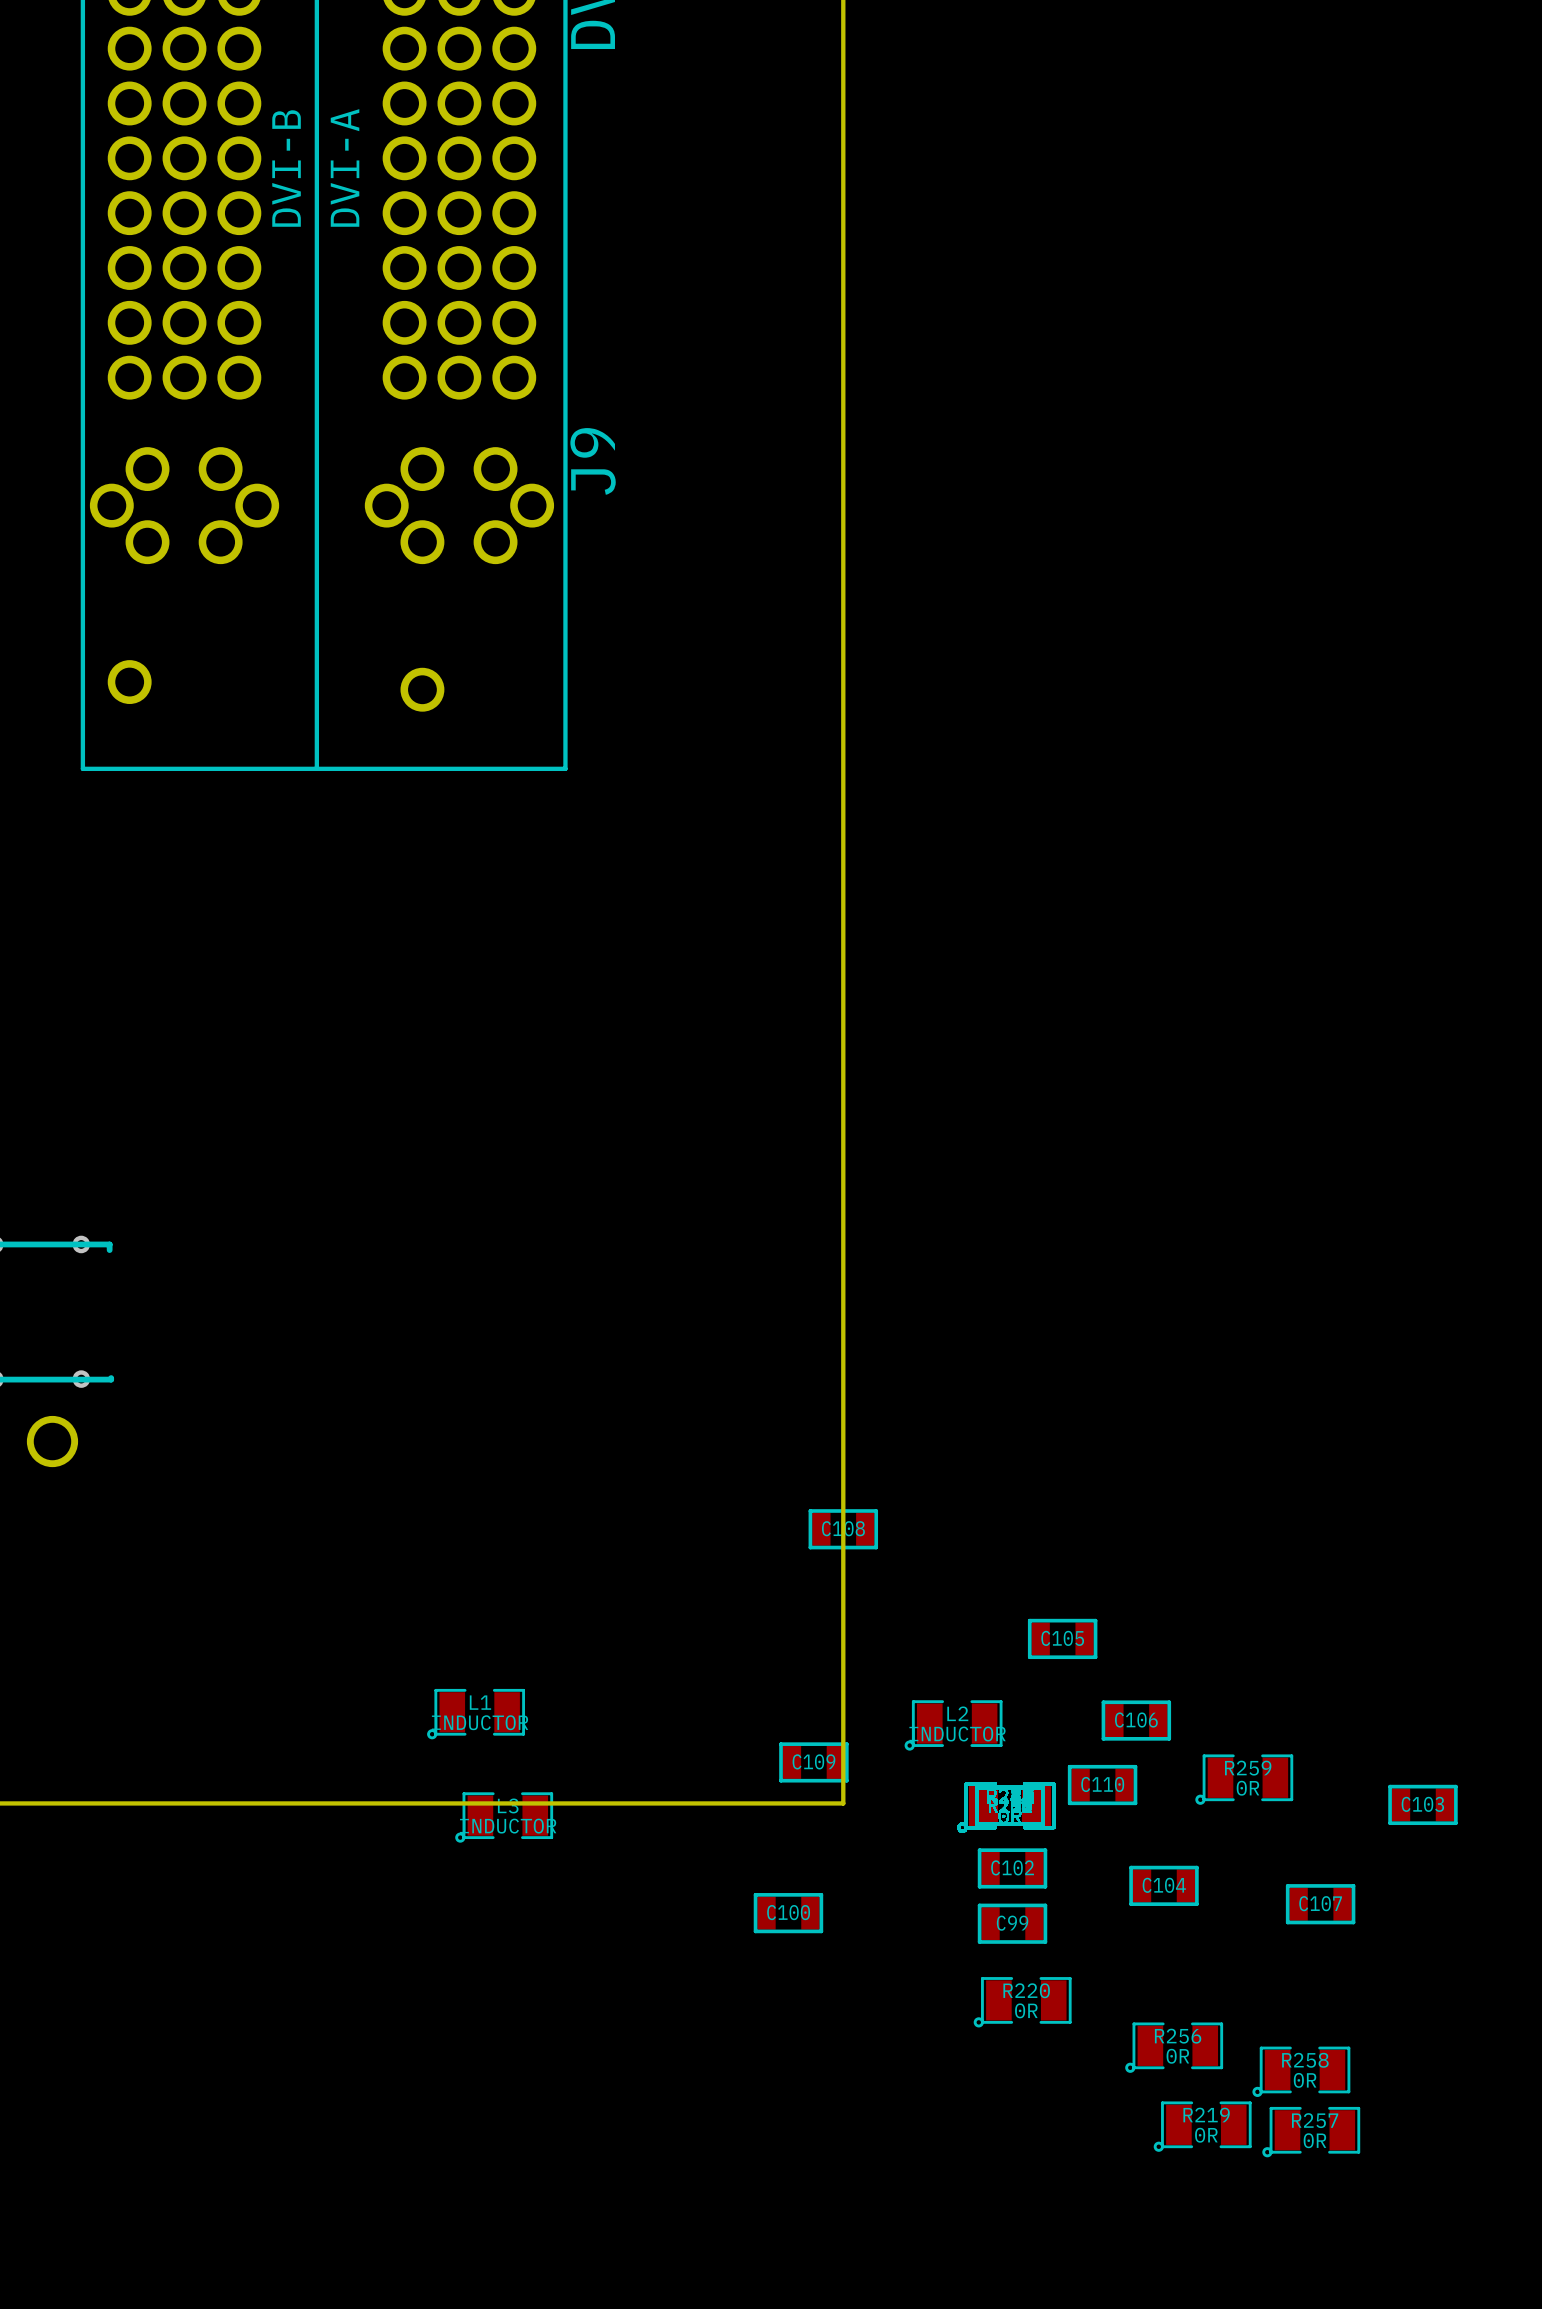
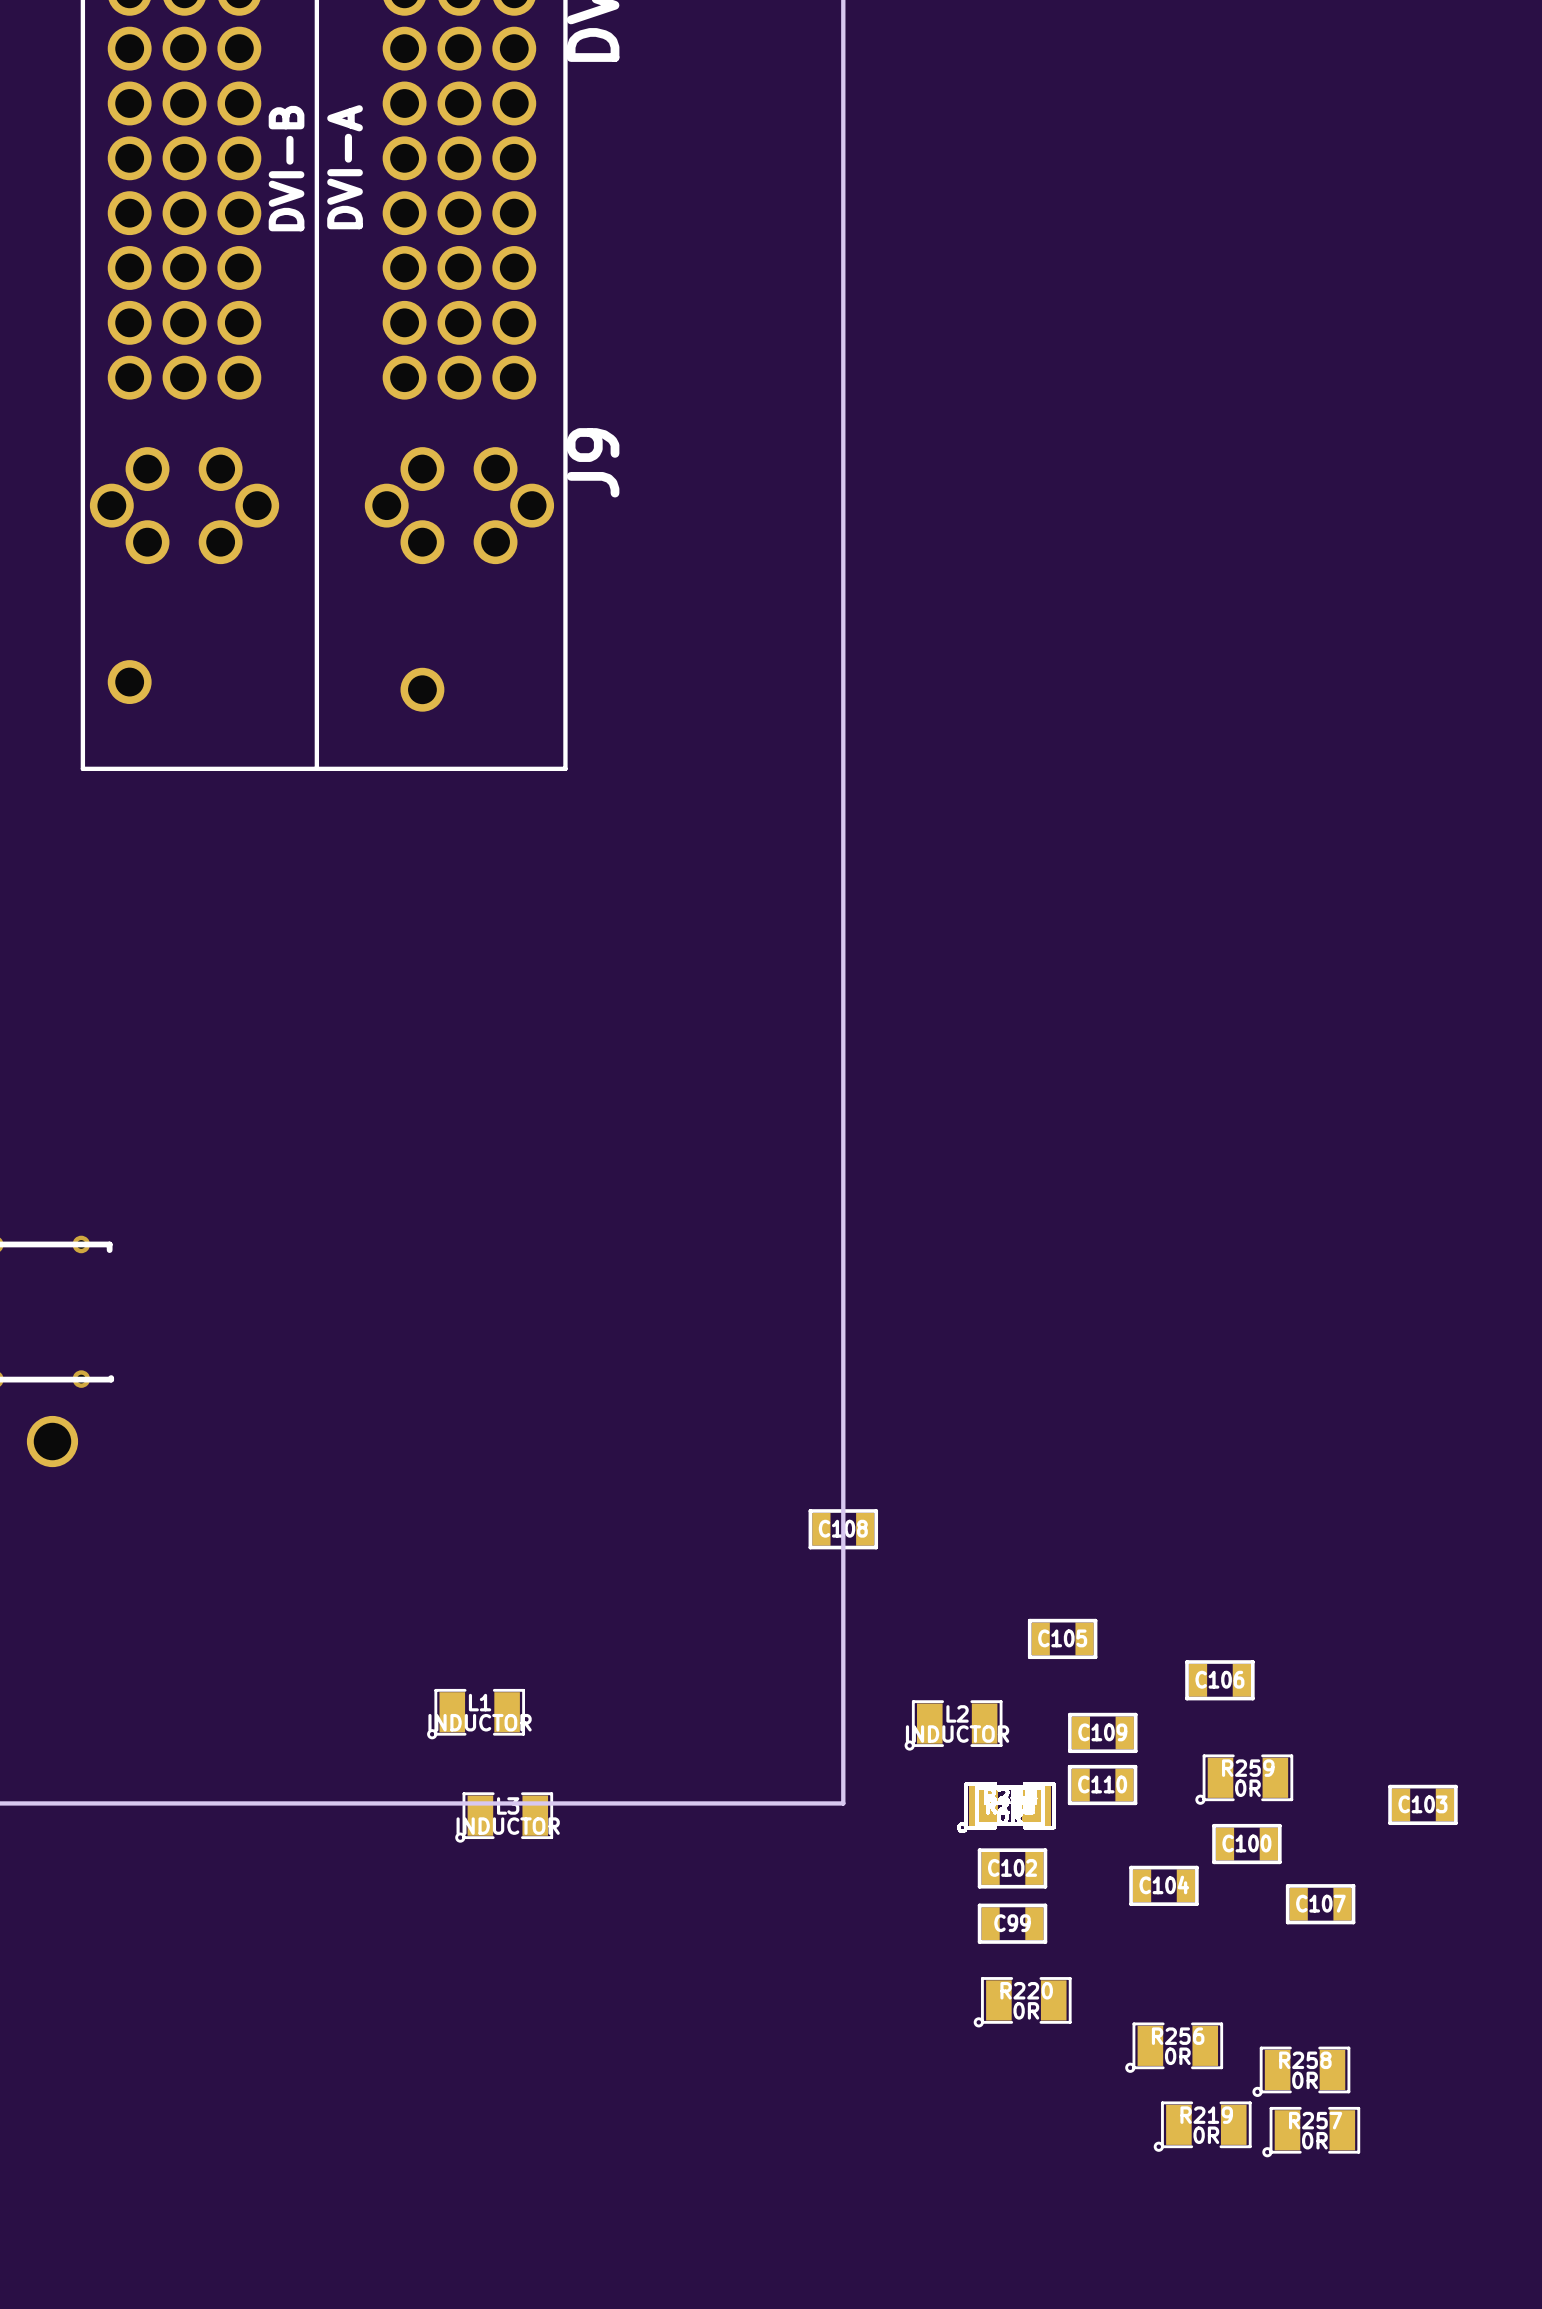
C106 position: (1136, 1720) -> (1219, 1680)
C109 position: (813, 1762) -> (1102, 1732)
C100 position: (788, 1913) -> (1246, 1844)

